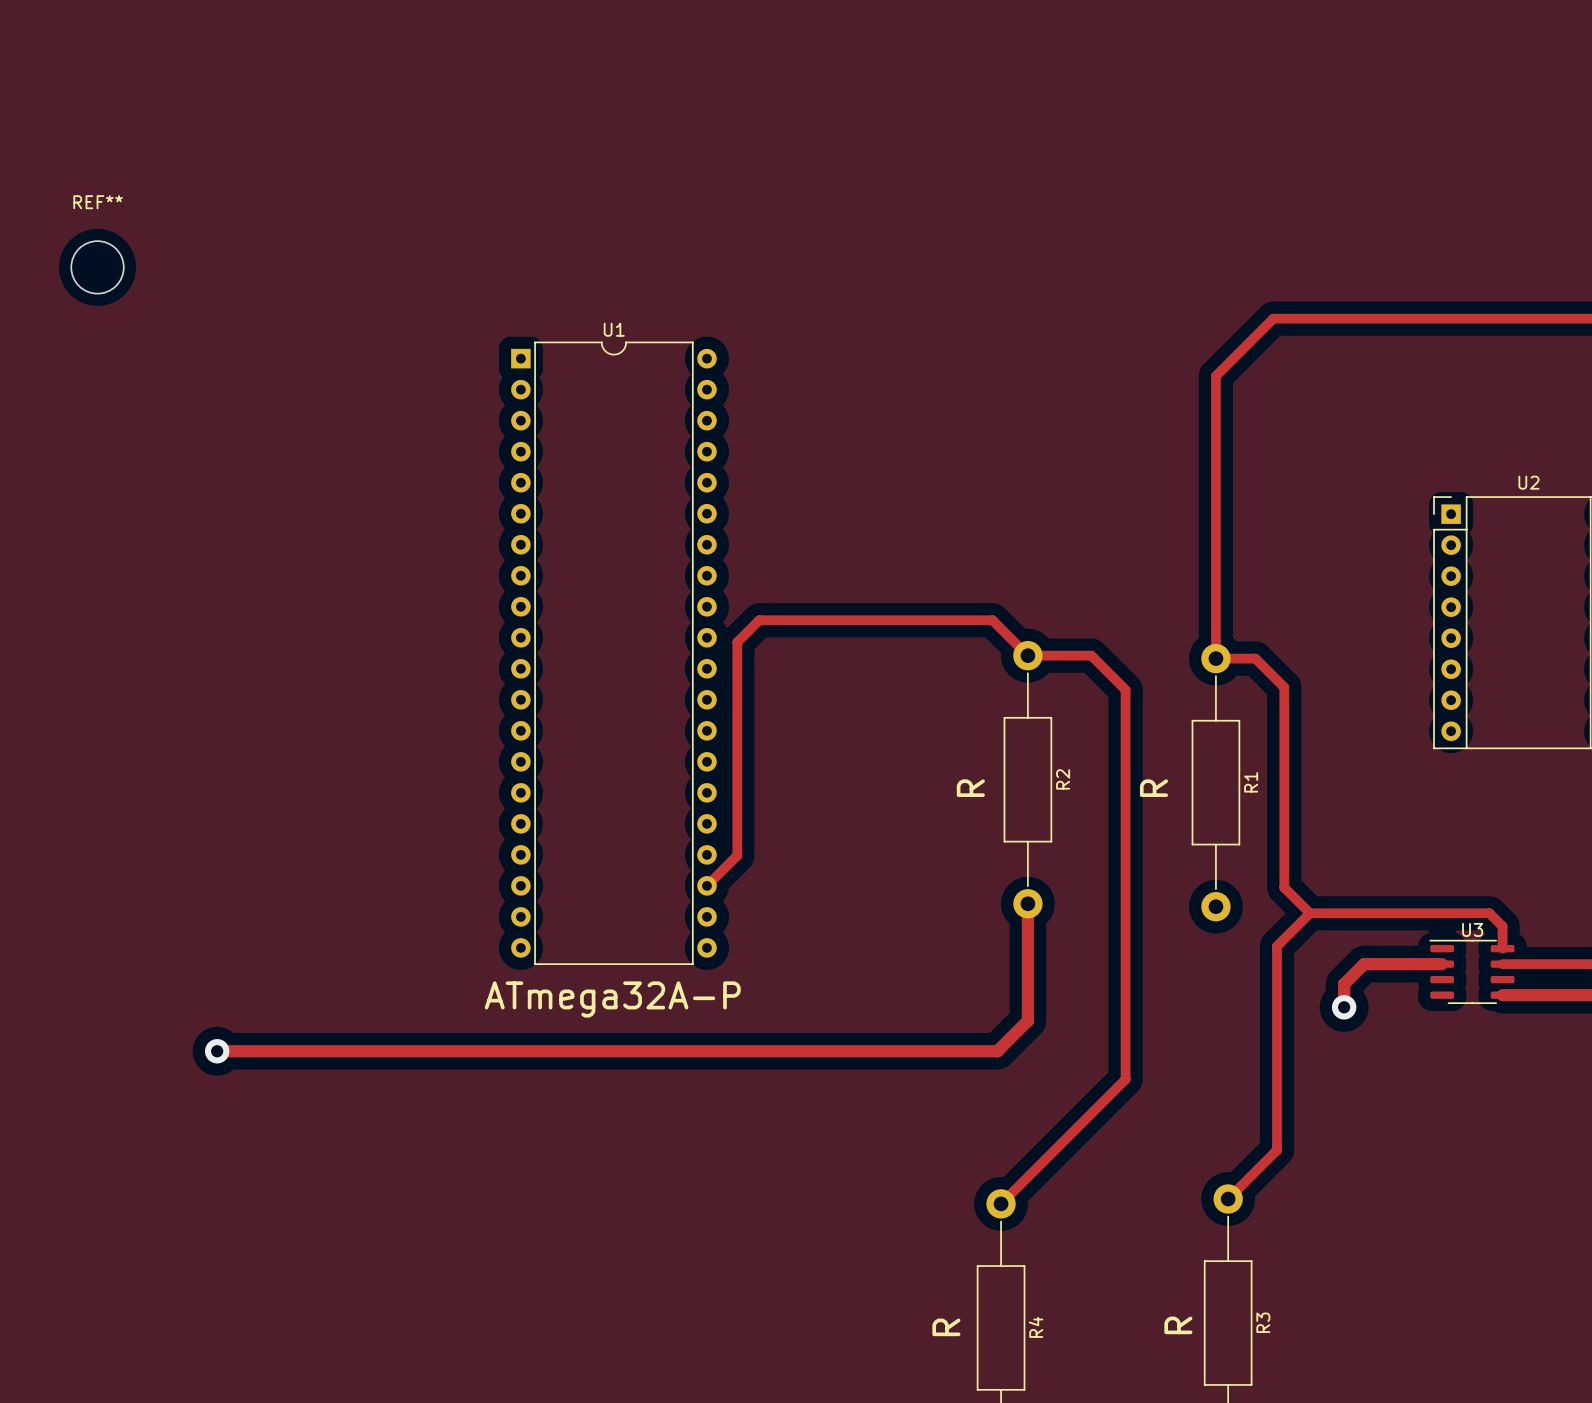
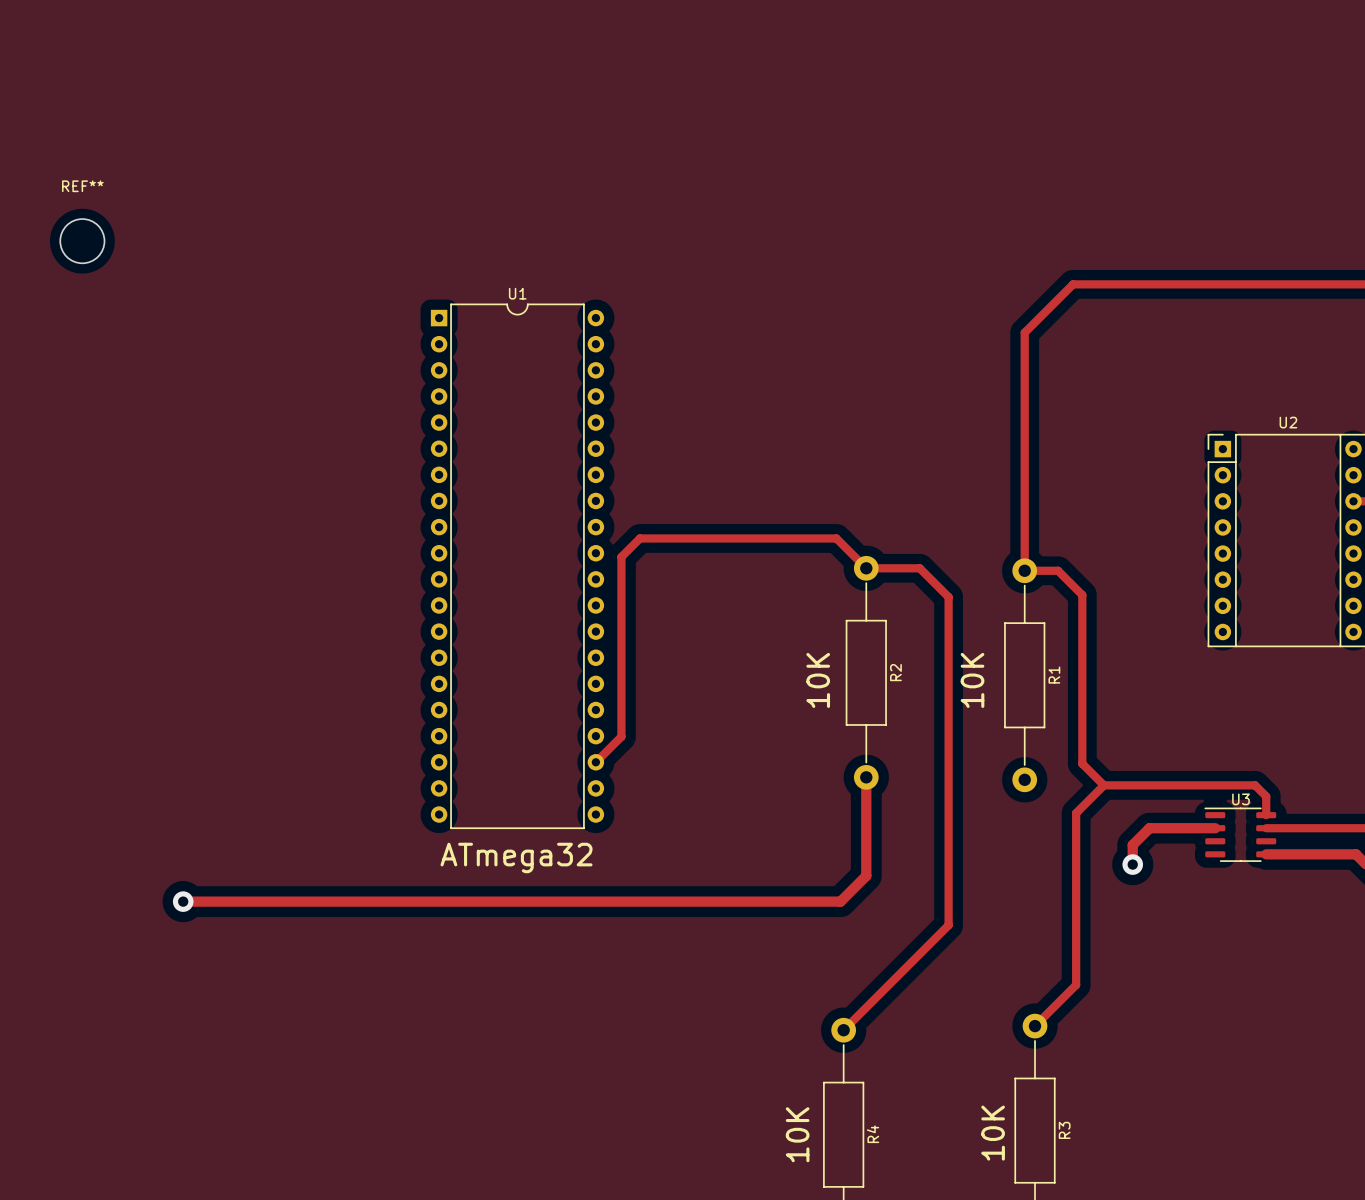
R2 value: R (970, 788) -> 10K (818, 680)
R1 value: R (1153, 788) -> 10K (972, 680)
U1 value: ATmega32A-P (612, 999) -> ATmega32 (516, 857)
R3 value: R (1178, 1325) -> 10K (993, 1133)
R4 value: R (946, 1327) -> 10K (797, 1134)

